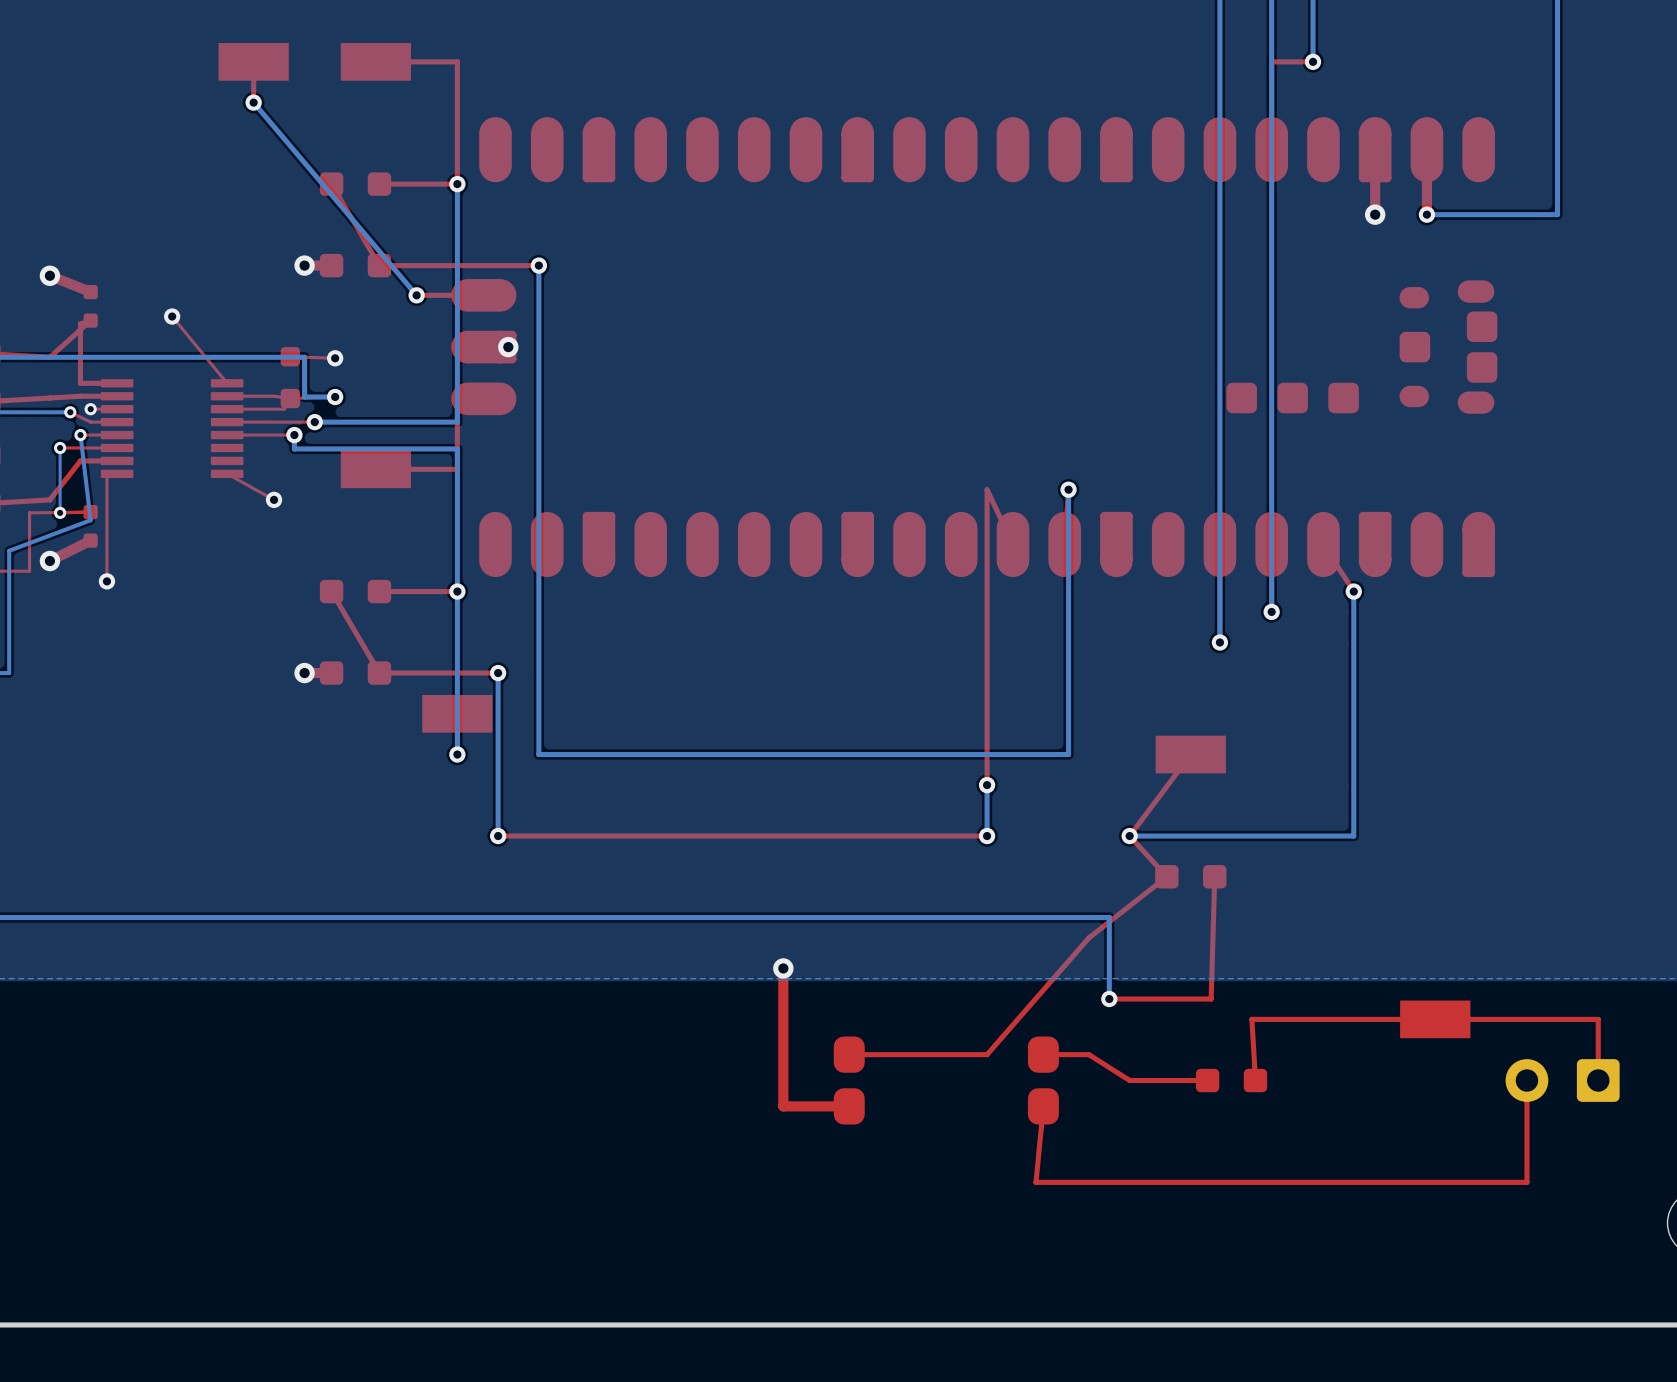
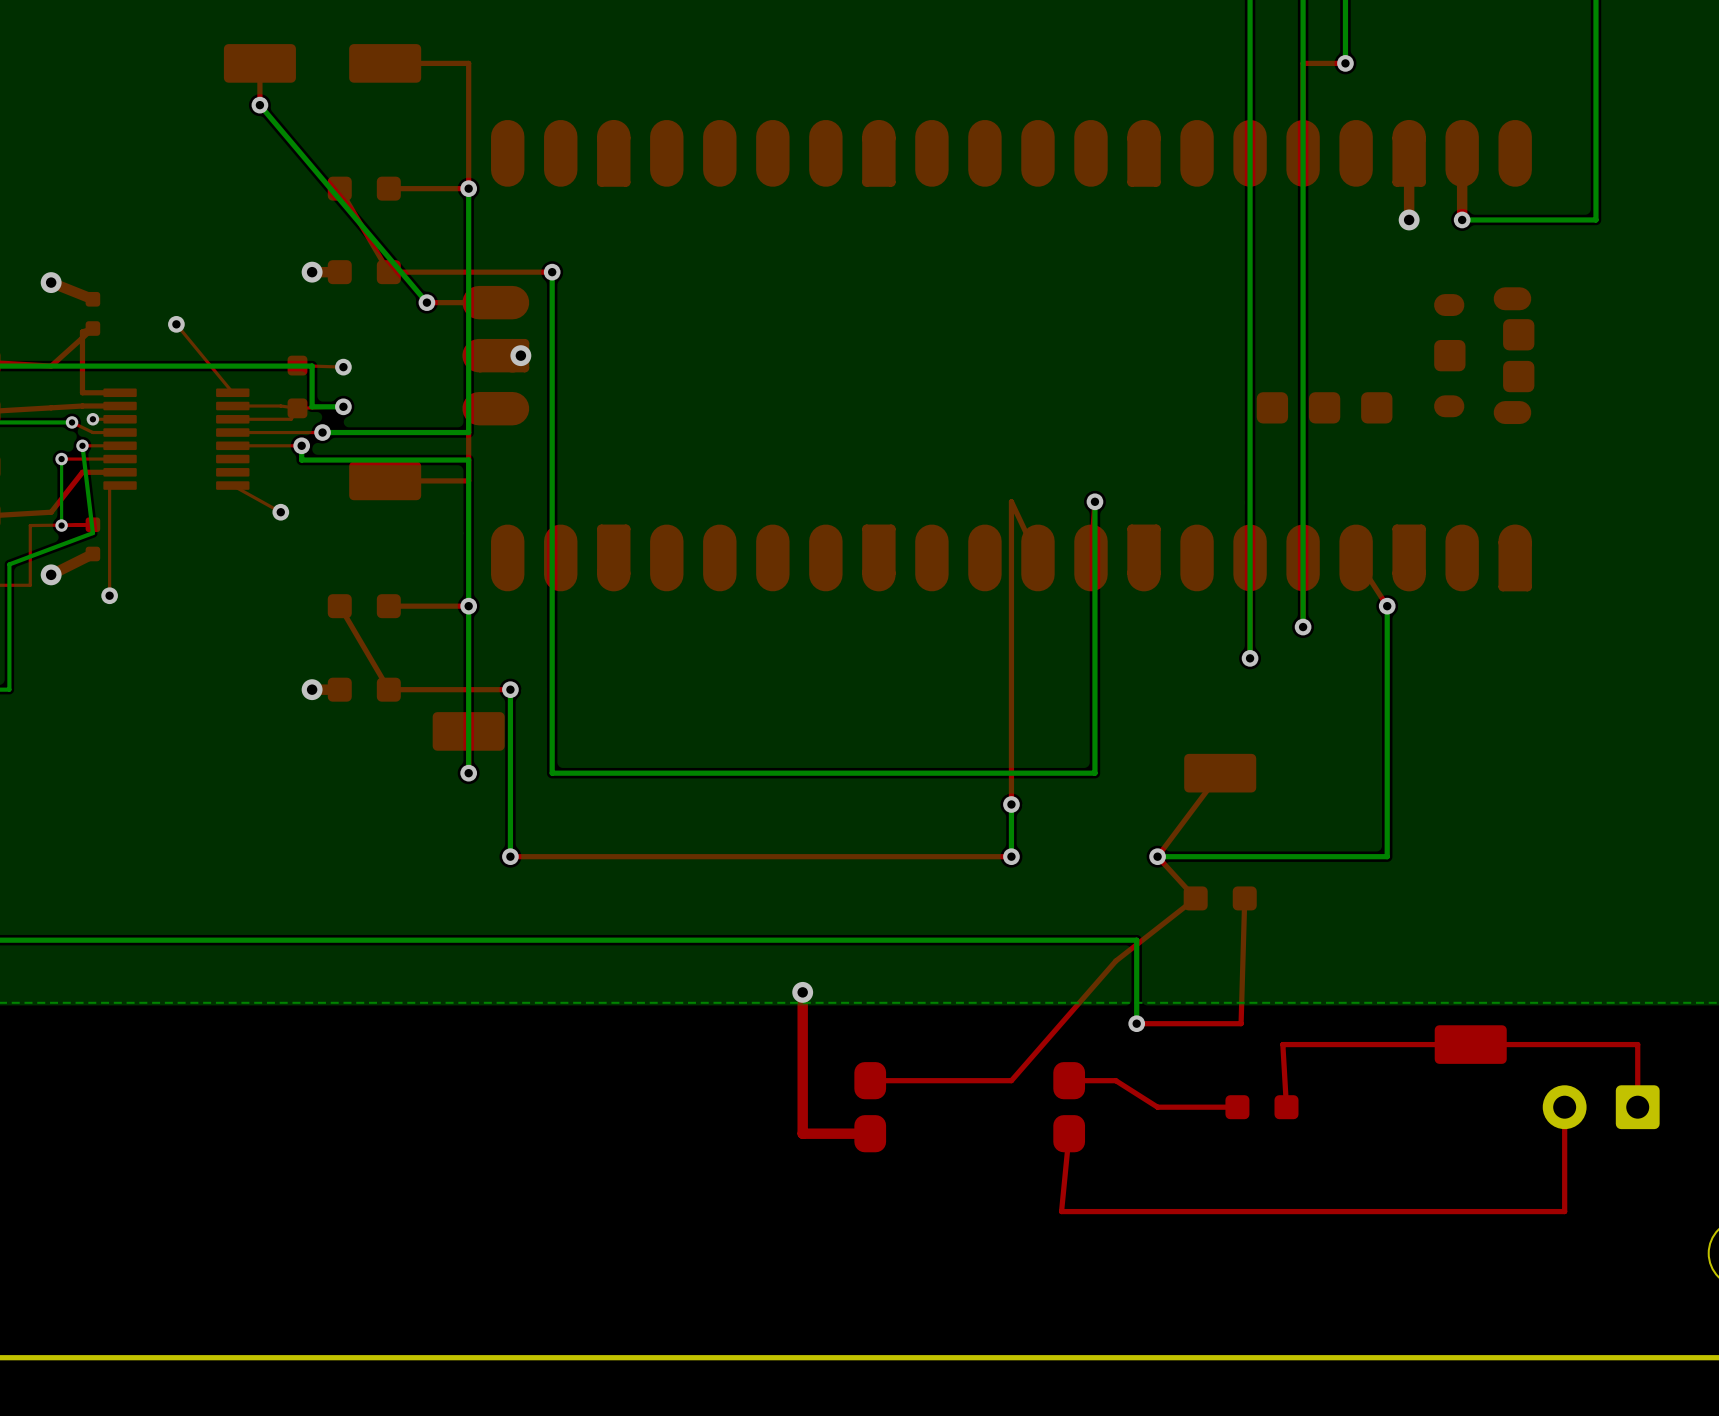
part footprint: [218, 43, 289, 81] -> [223, 44, 296, 83]
part footprint: [340, 43, 412, 81] -> [349, 44, 422, 83]
part footprint: [340, 450, 412, 489] -> [349, 461, 422, 501]
part footprint: [422, 694, 493, 733] -> [432, 712, 505, 751]
part footprint: [1155, 735, 1226, 774] -> [1184, 753, 1257, 793]
part footprint: [1400, 1000, 1471, 1039] -> [1434, 1025, 1507, 1064]

